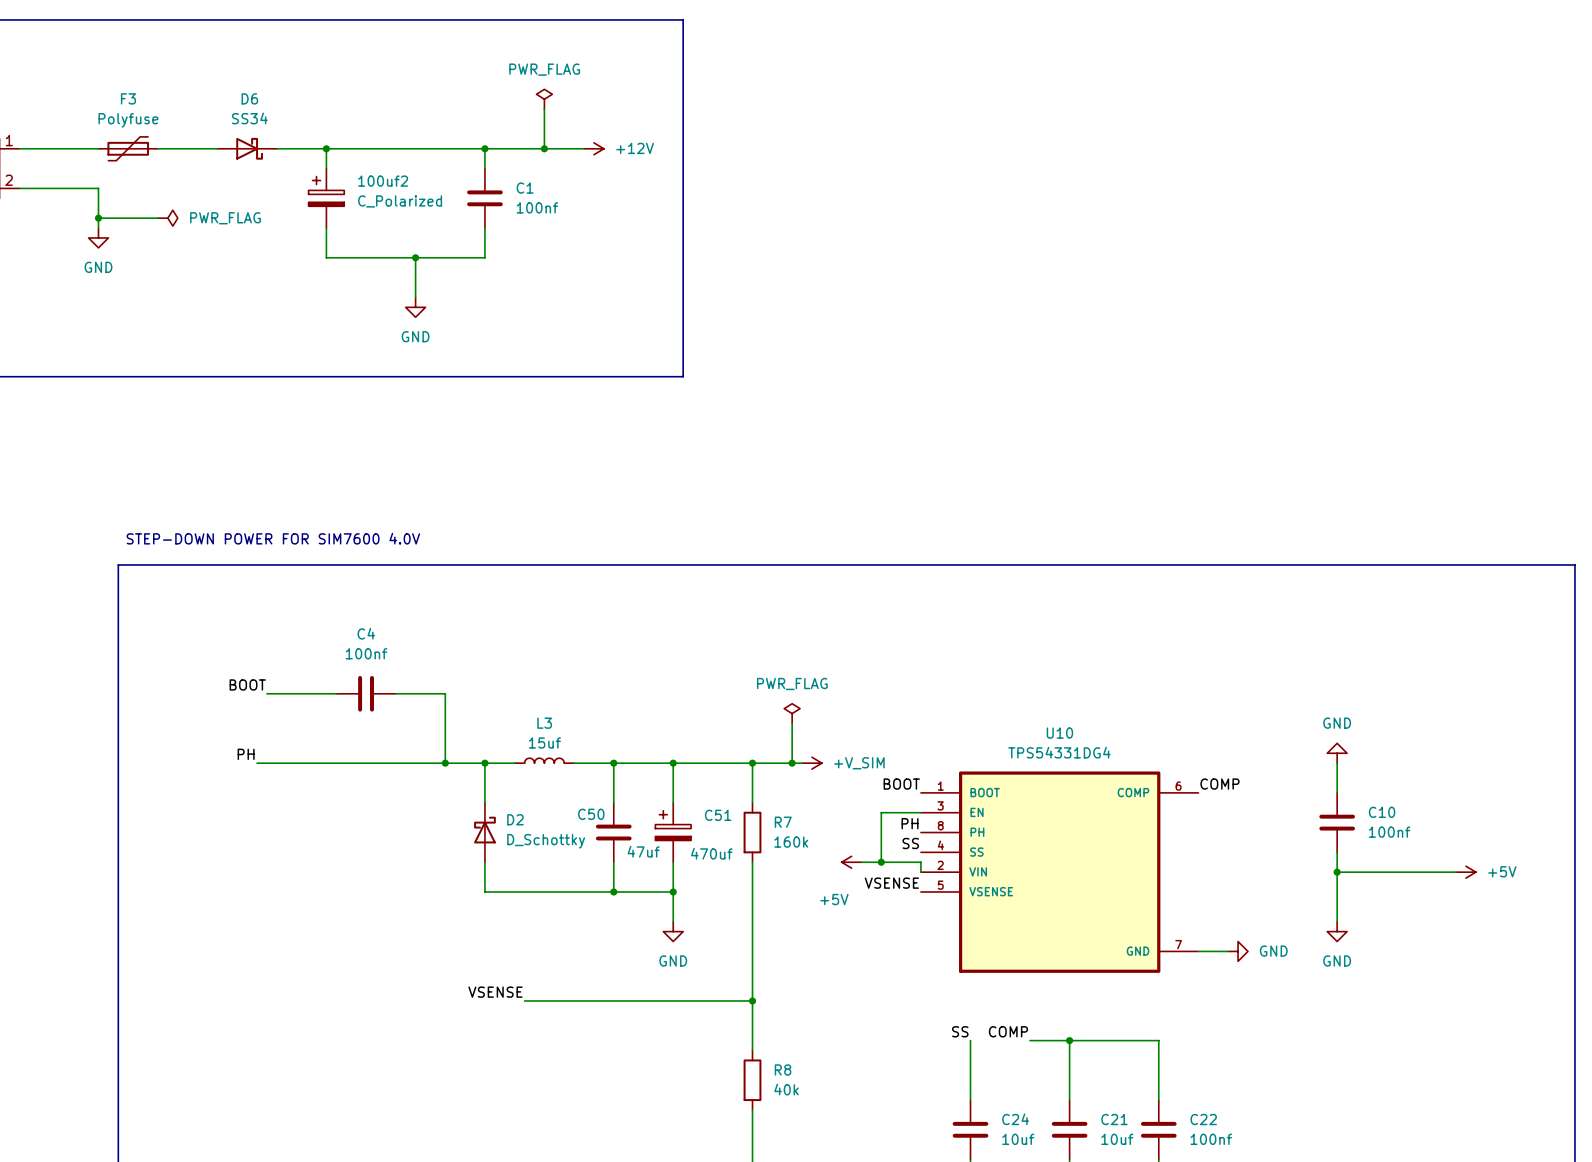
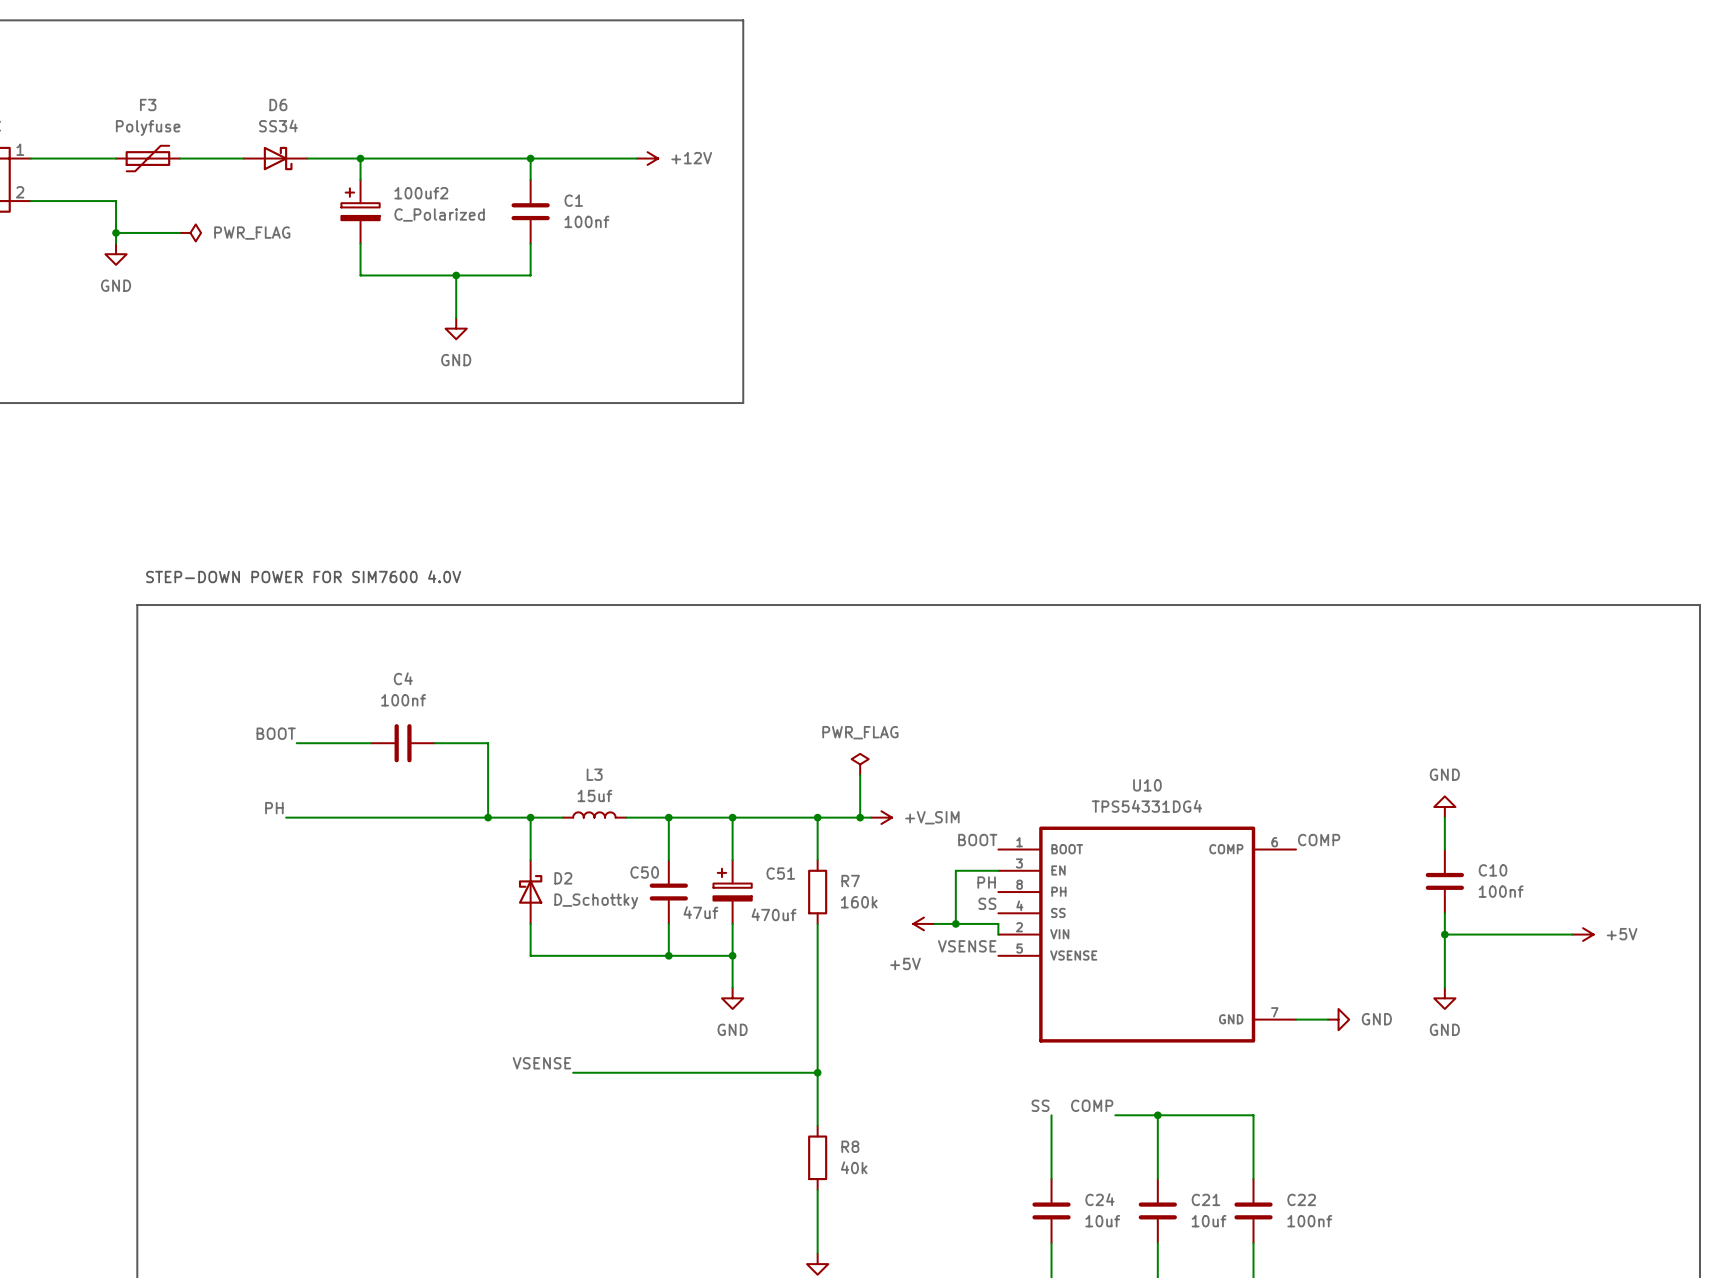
power symbol: PWR_FLAG (544, 99) -> none
wire: (544, 109) (544, 148) -> none
junction: (544, 148) -> none

